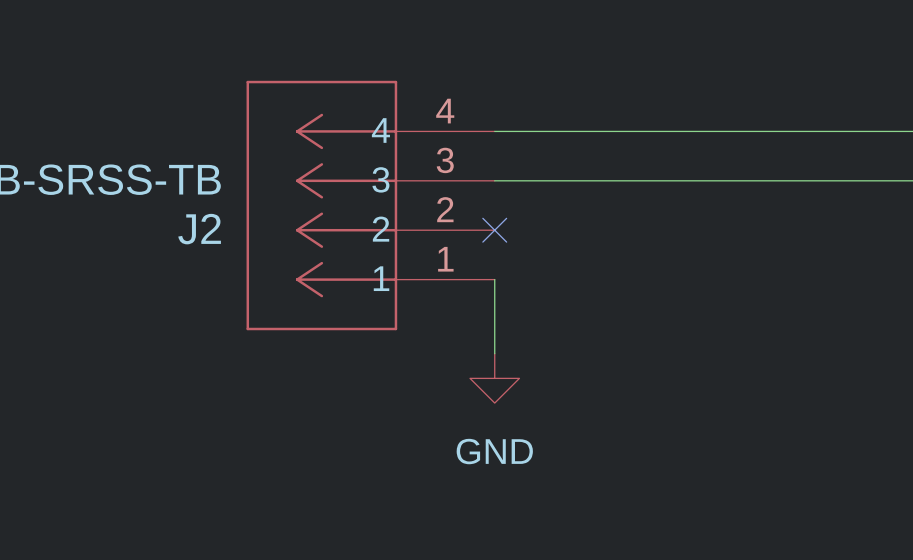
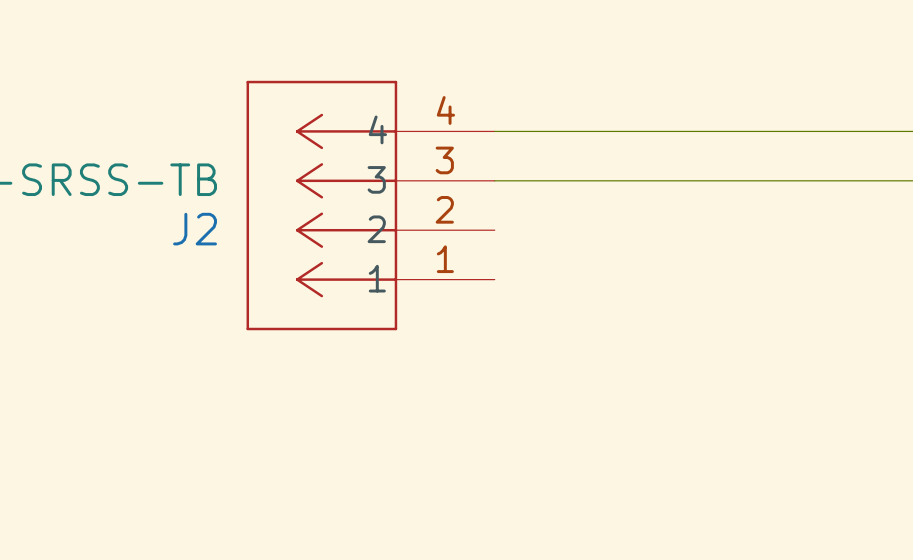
no-connect mark: (494, 230) -> none
wire: (494, 279) (494, 353) -> none
power symbol: GND (494, 378) -> none

